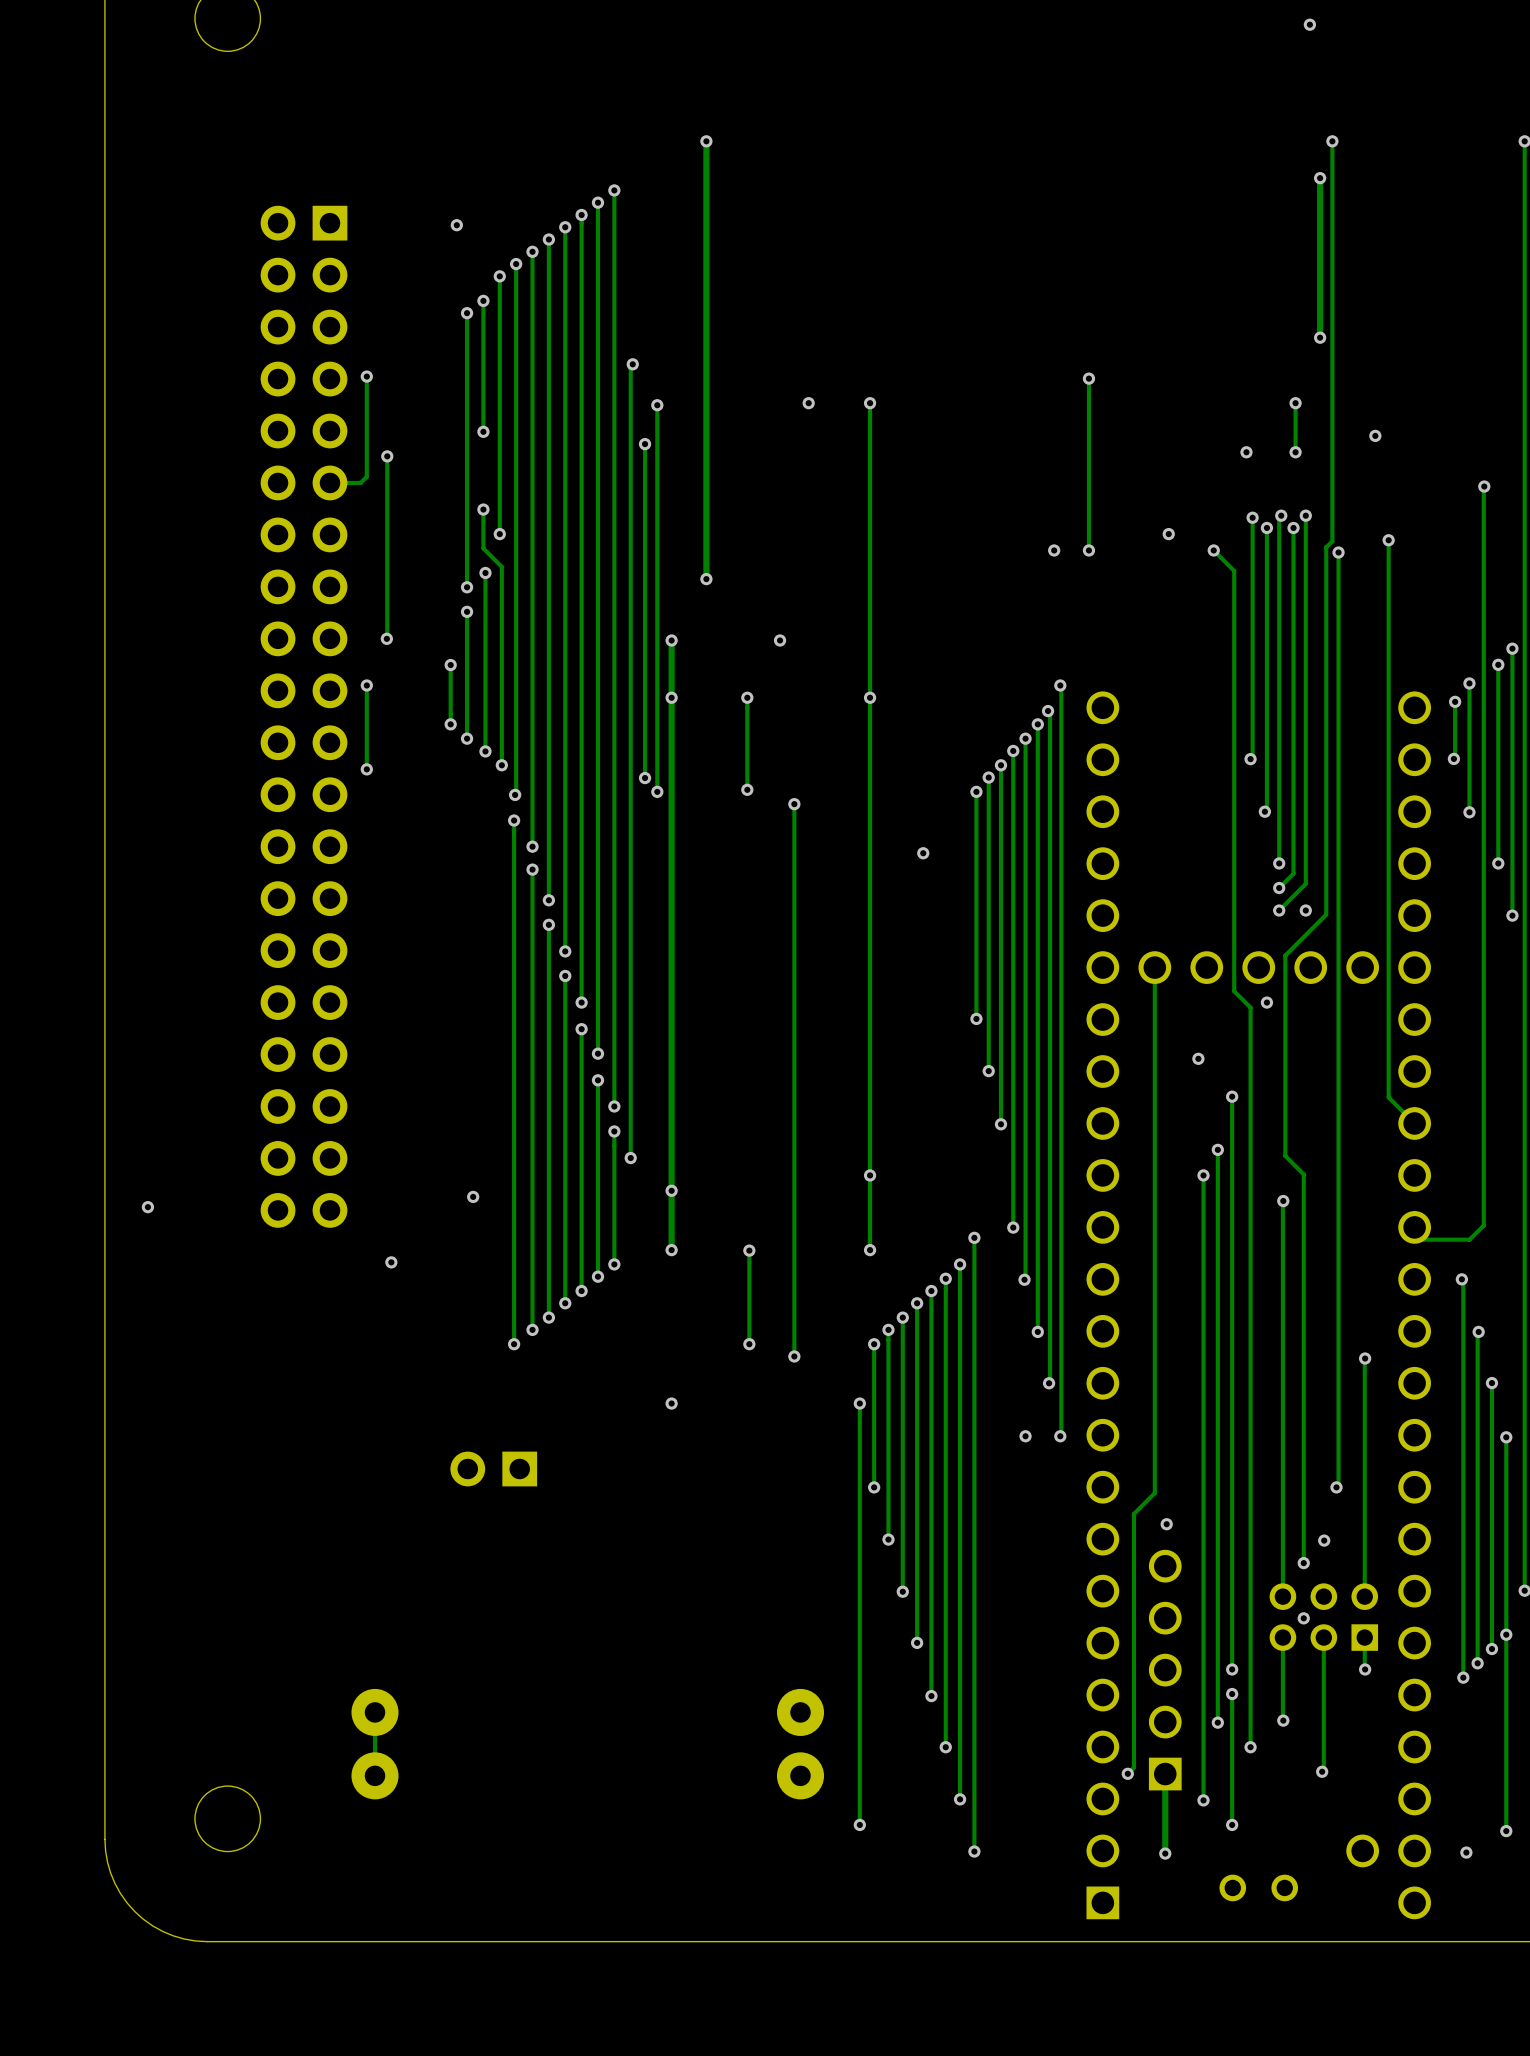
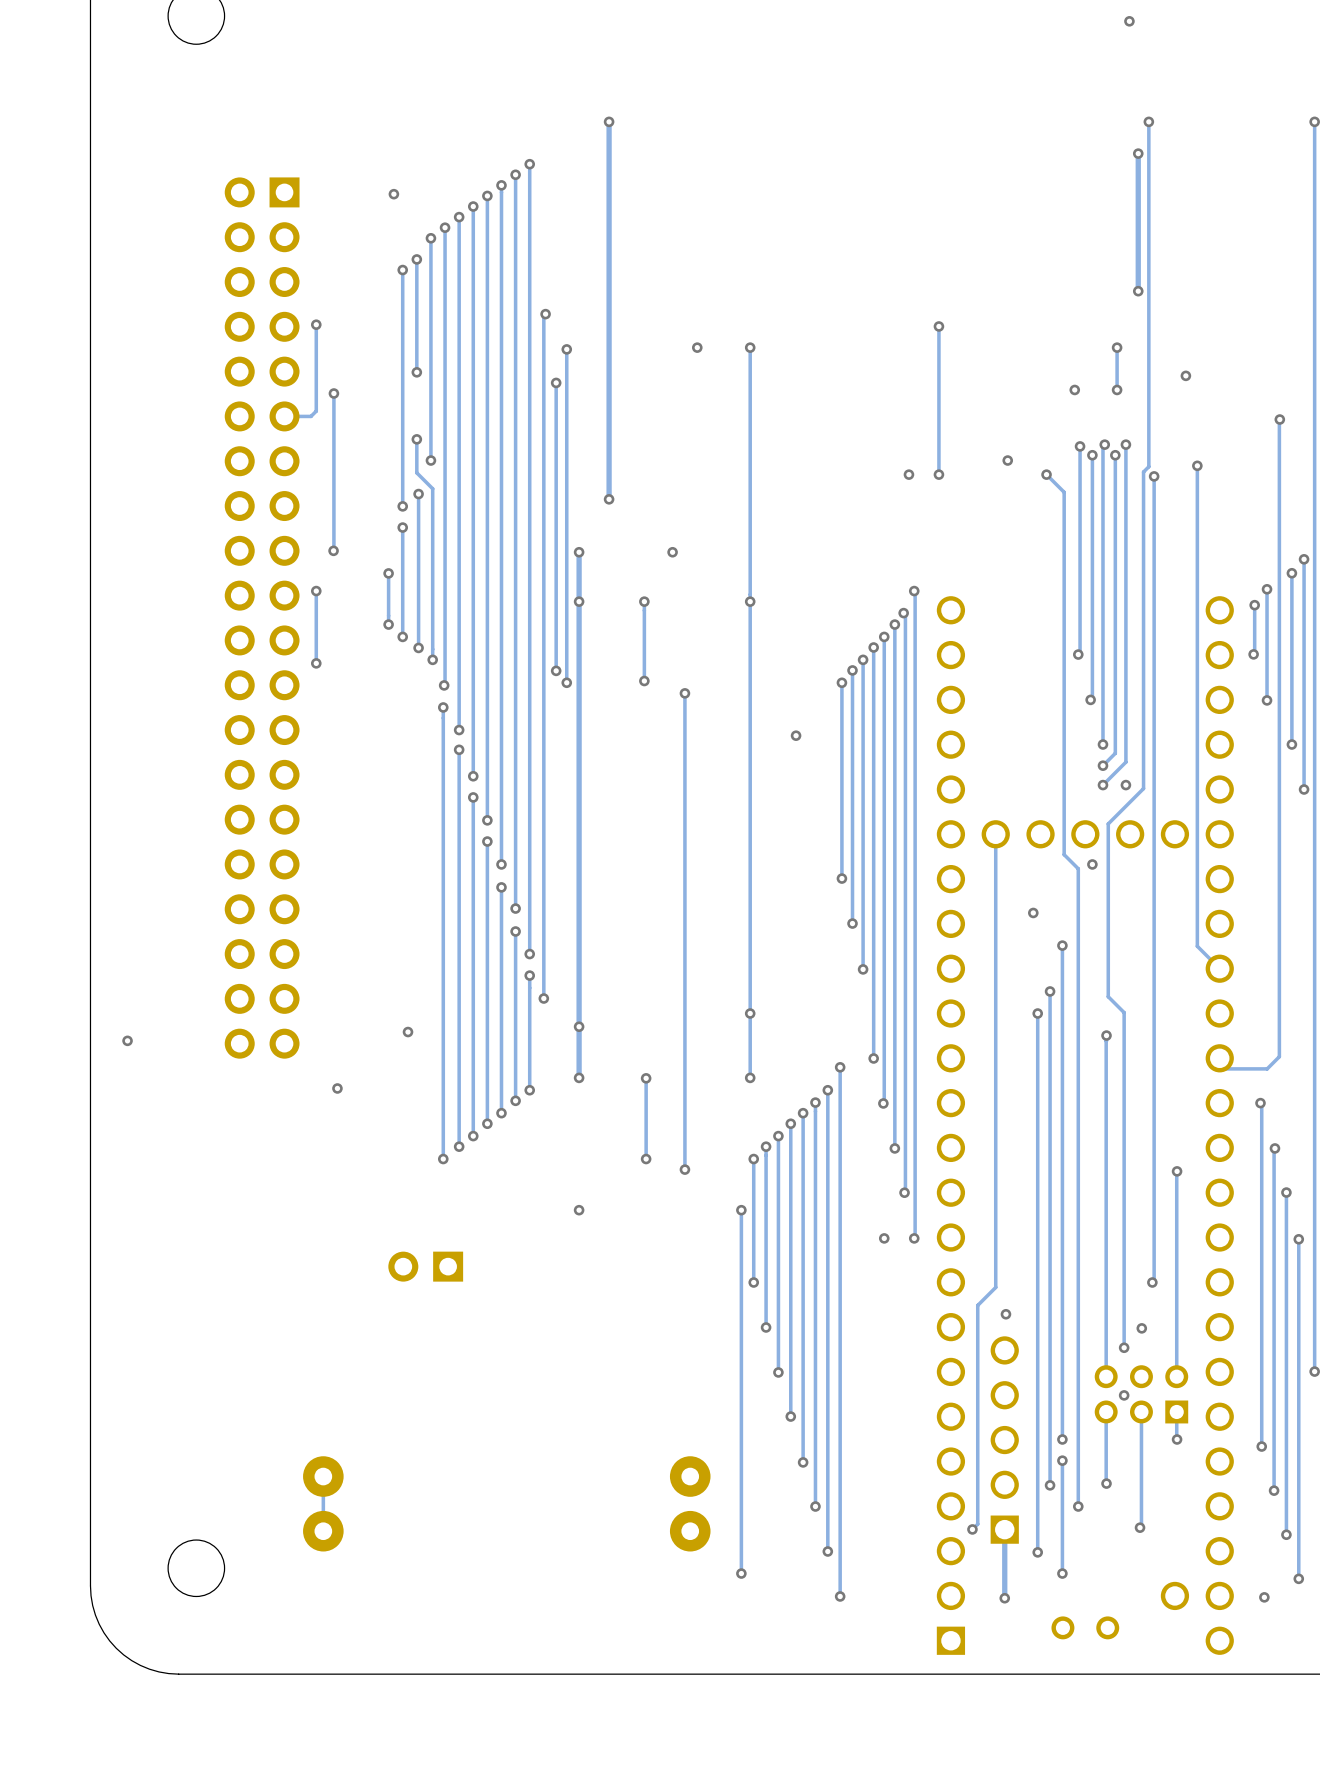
via: (1506, 1634) -> none
track: none -> (1286, 1421) (1286, 1534)
via: (1491, 1649) -> none
track: none -> (1274, 1434) (1274, 1490)
via: (1477, 1663) -> none
via: none -> (1274, 1490)
via: none -> (1286, 1534)

